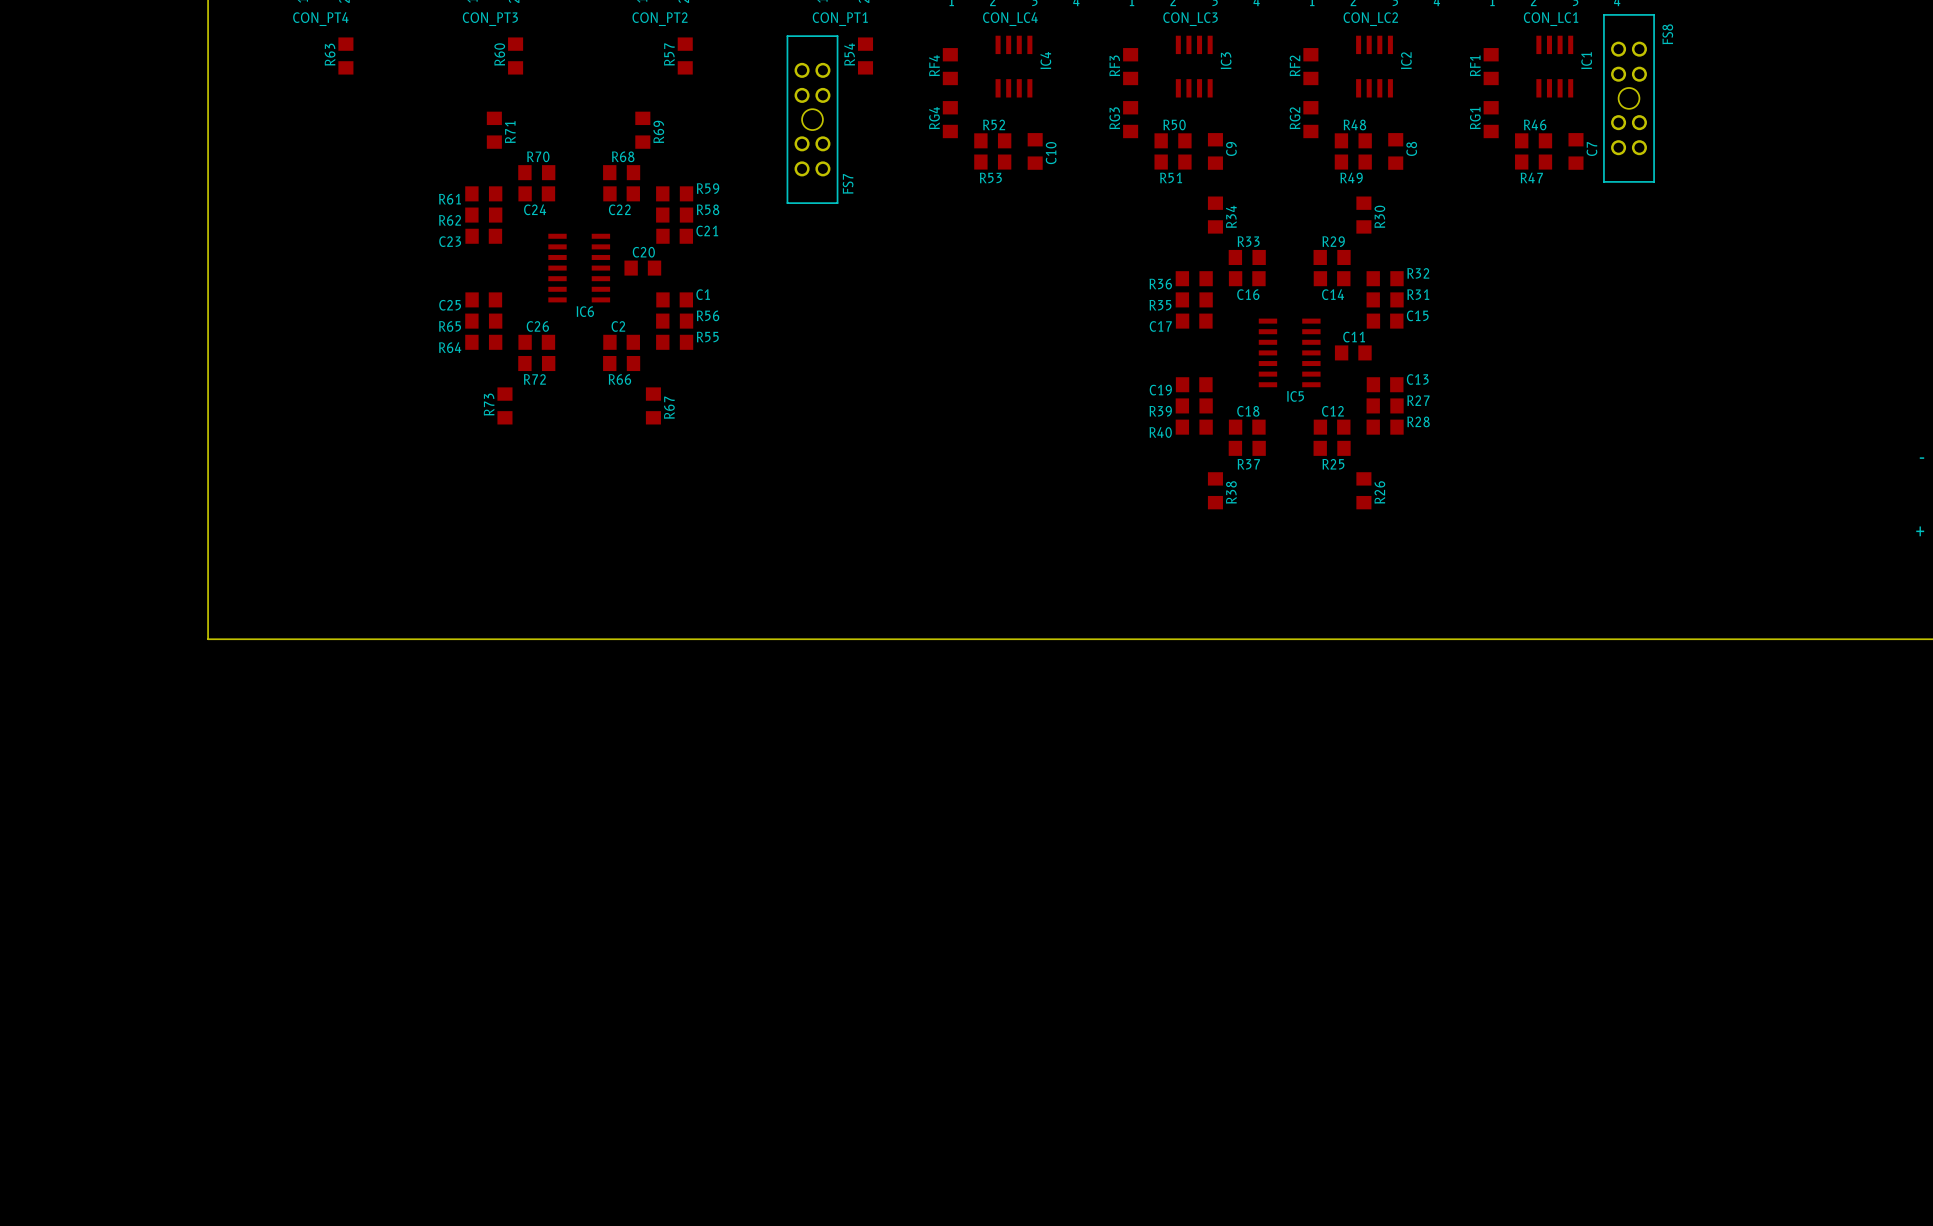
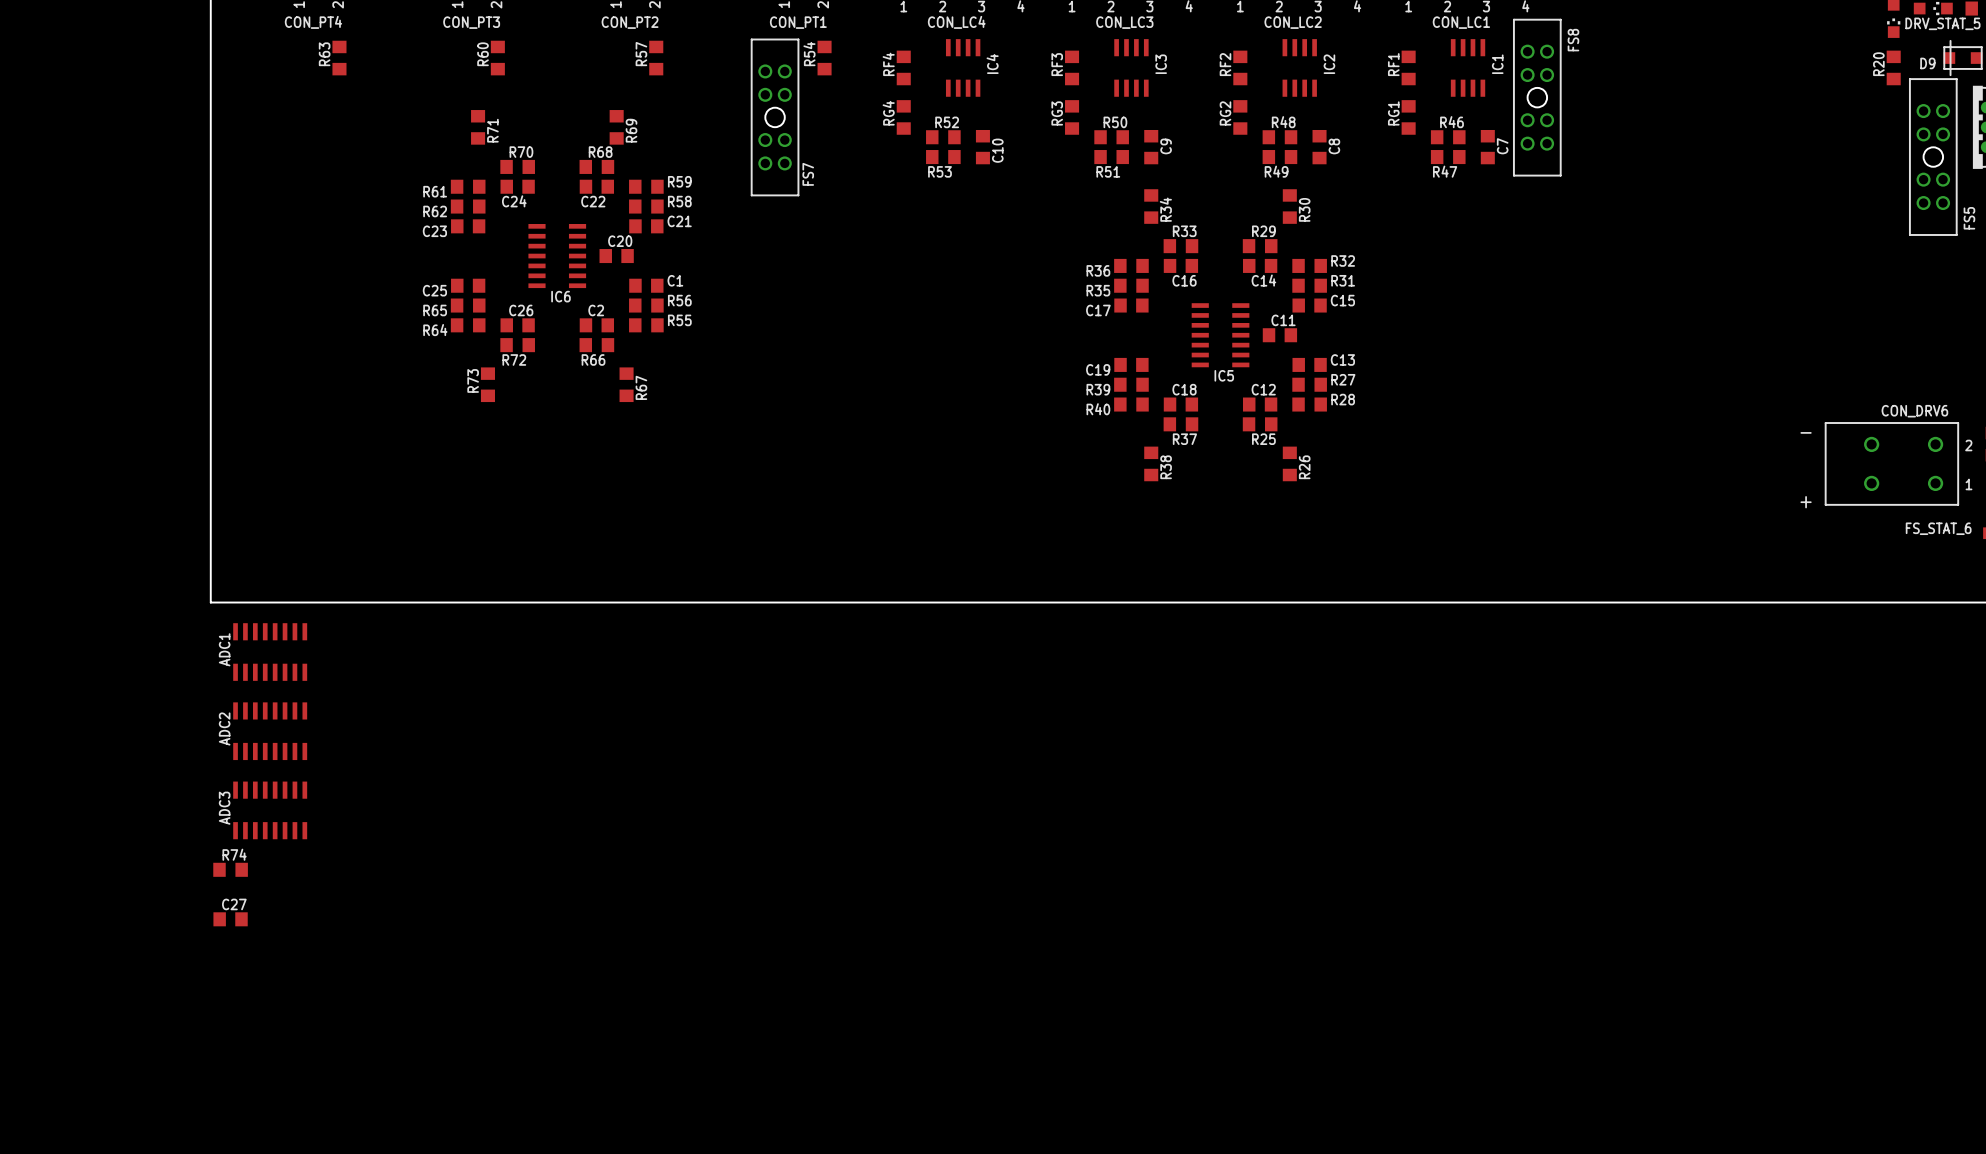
ADC1: none -> (270, 652)
ADC2: none -> (270, 731)
ADC3: none -> (270, 810)
R74: none -> (230, 869)
C27: none -> (230, 919)

